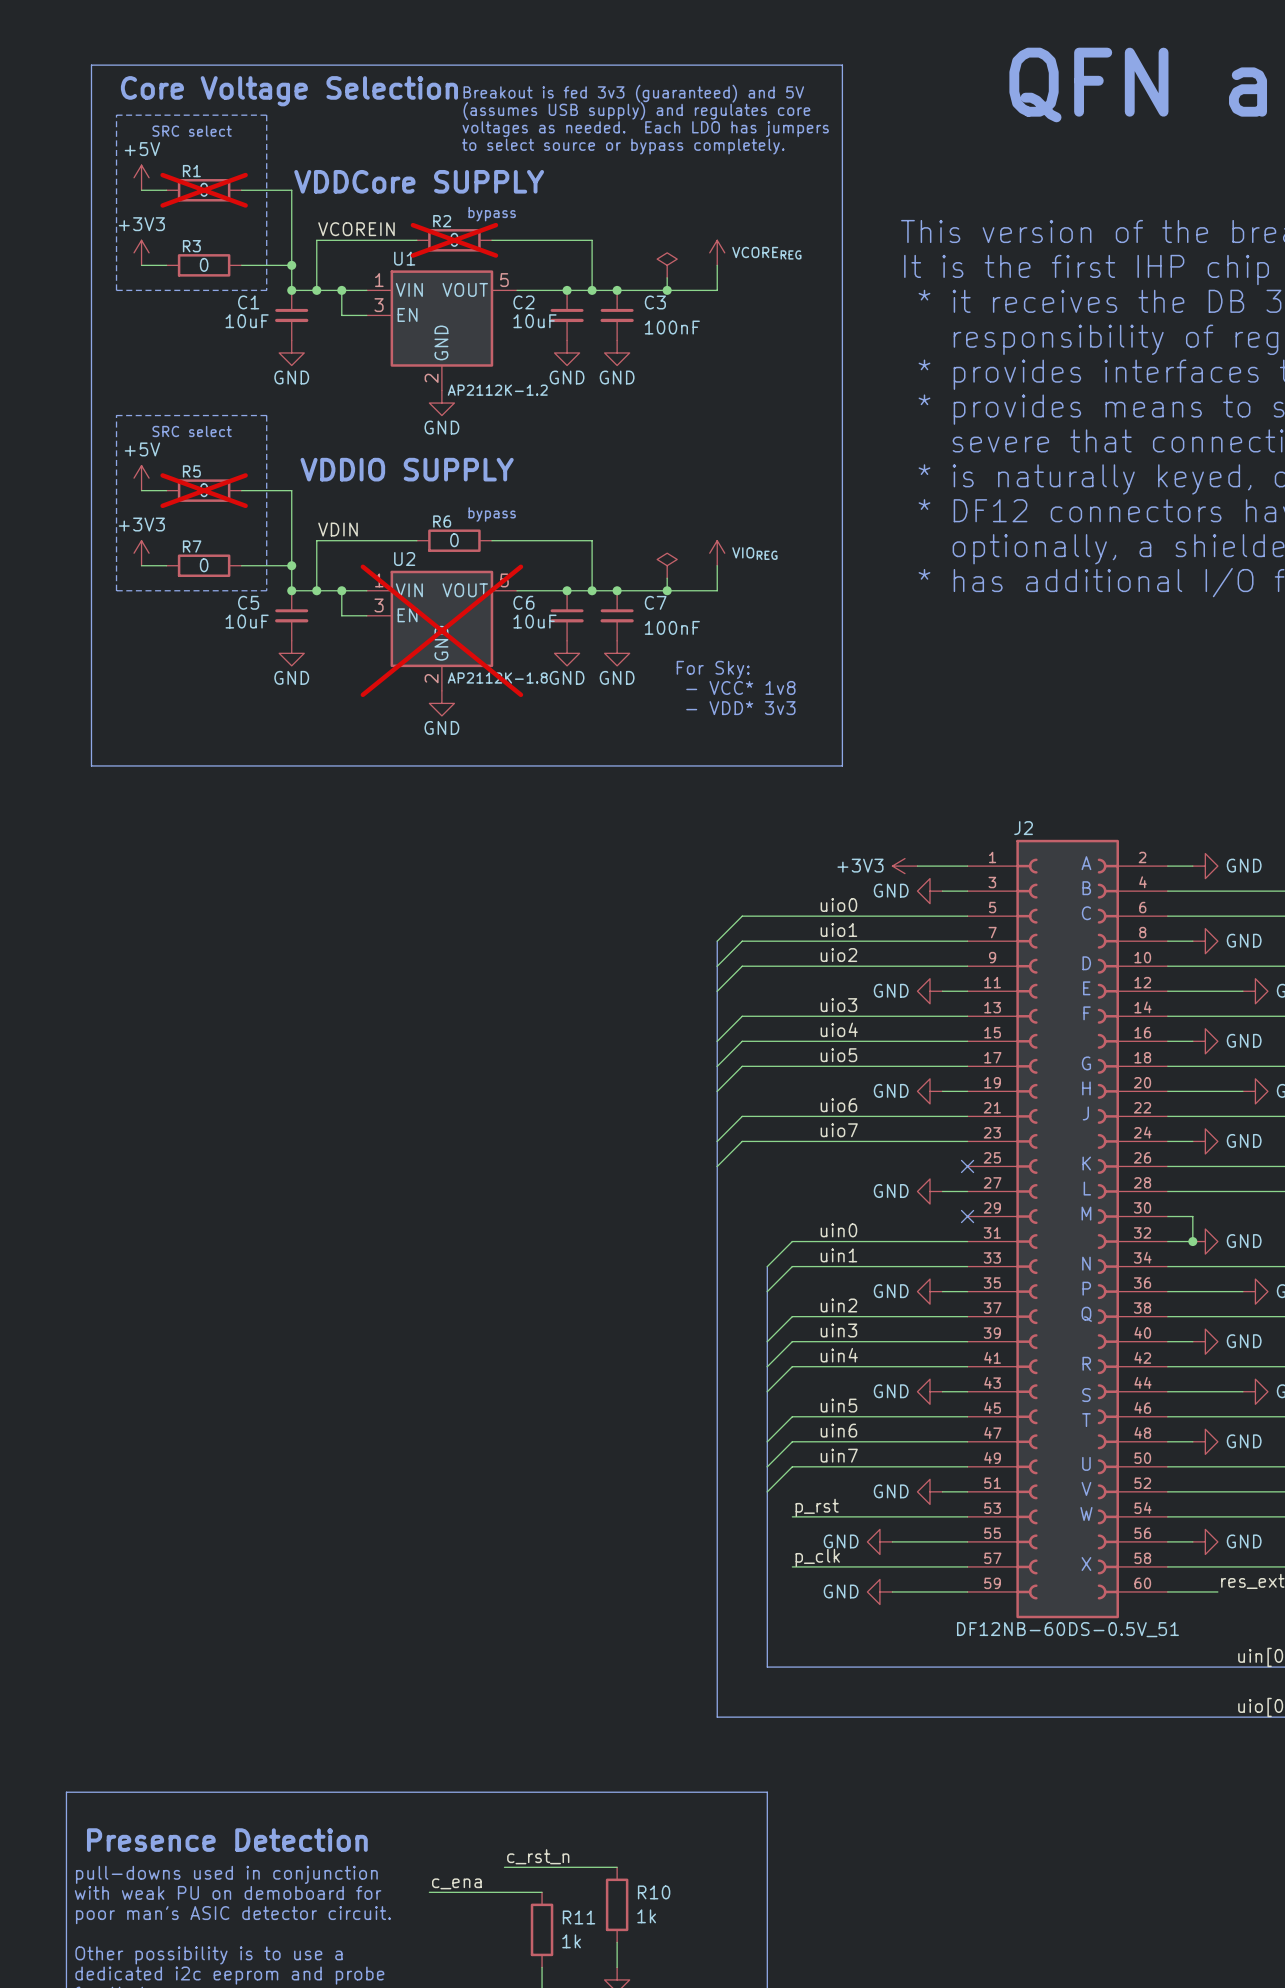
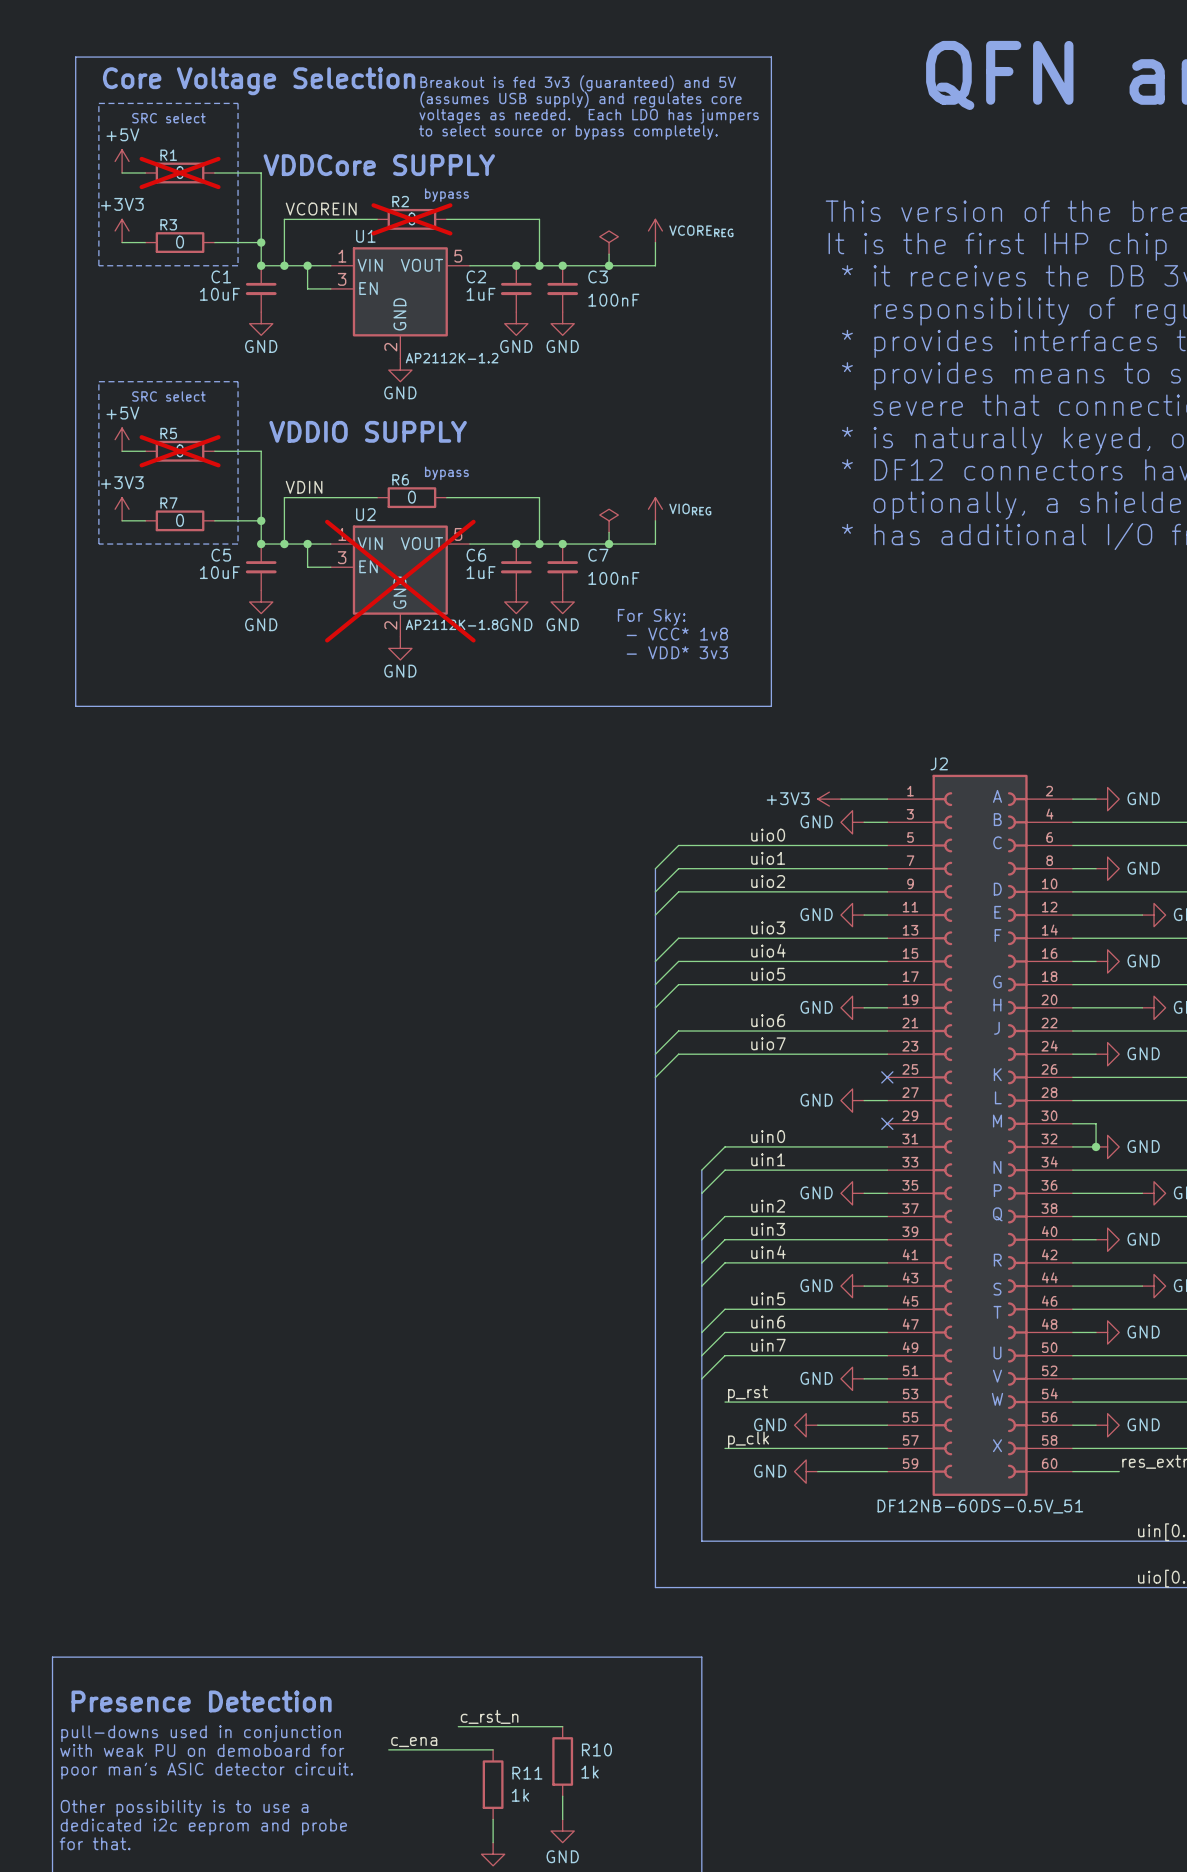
C2 value: 10uF (534, 321) -> 1uF (481, 294)
C6 value: 10uF (534, 621) -> 1uF (481, 572)

